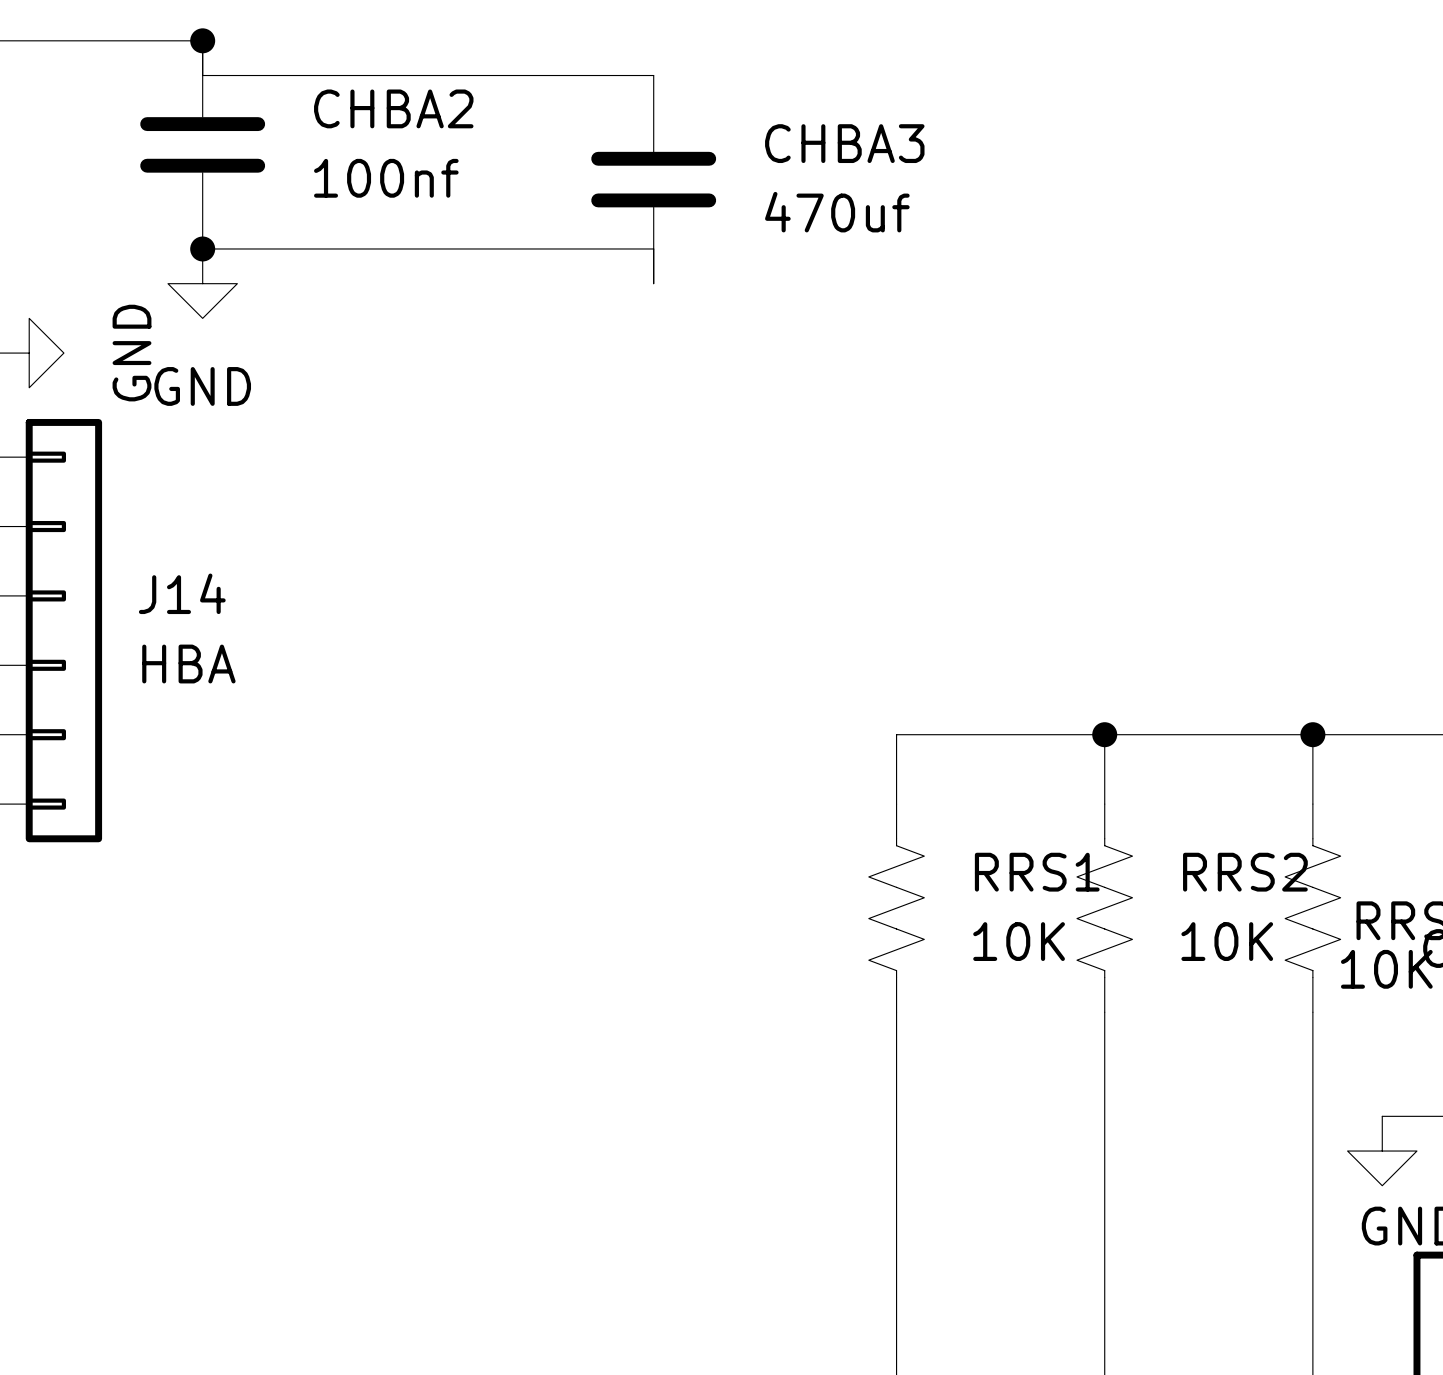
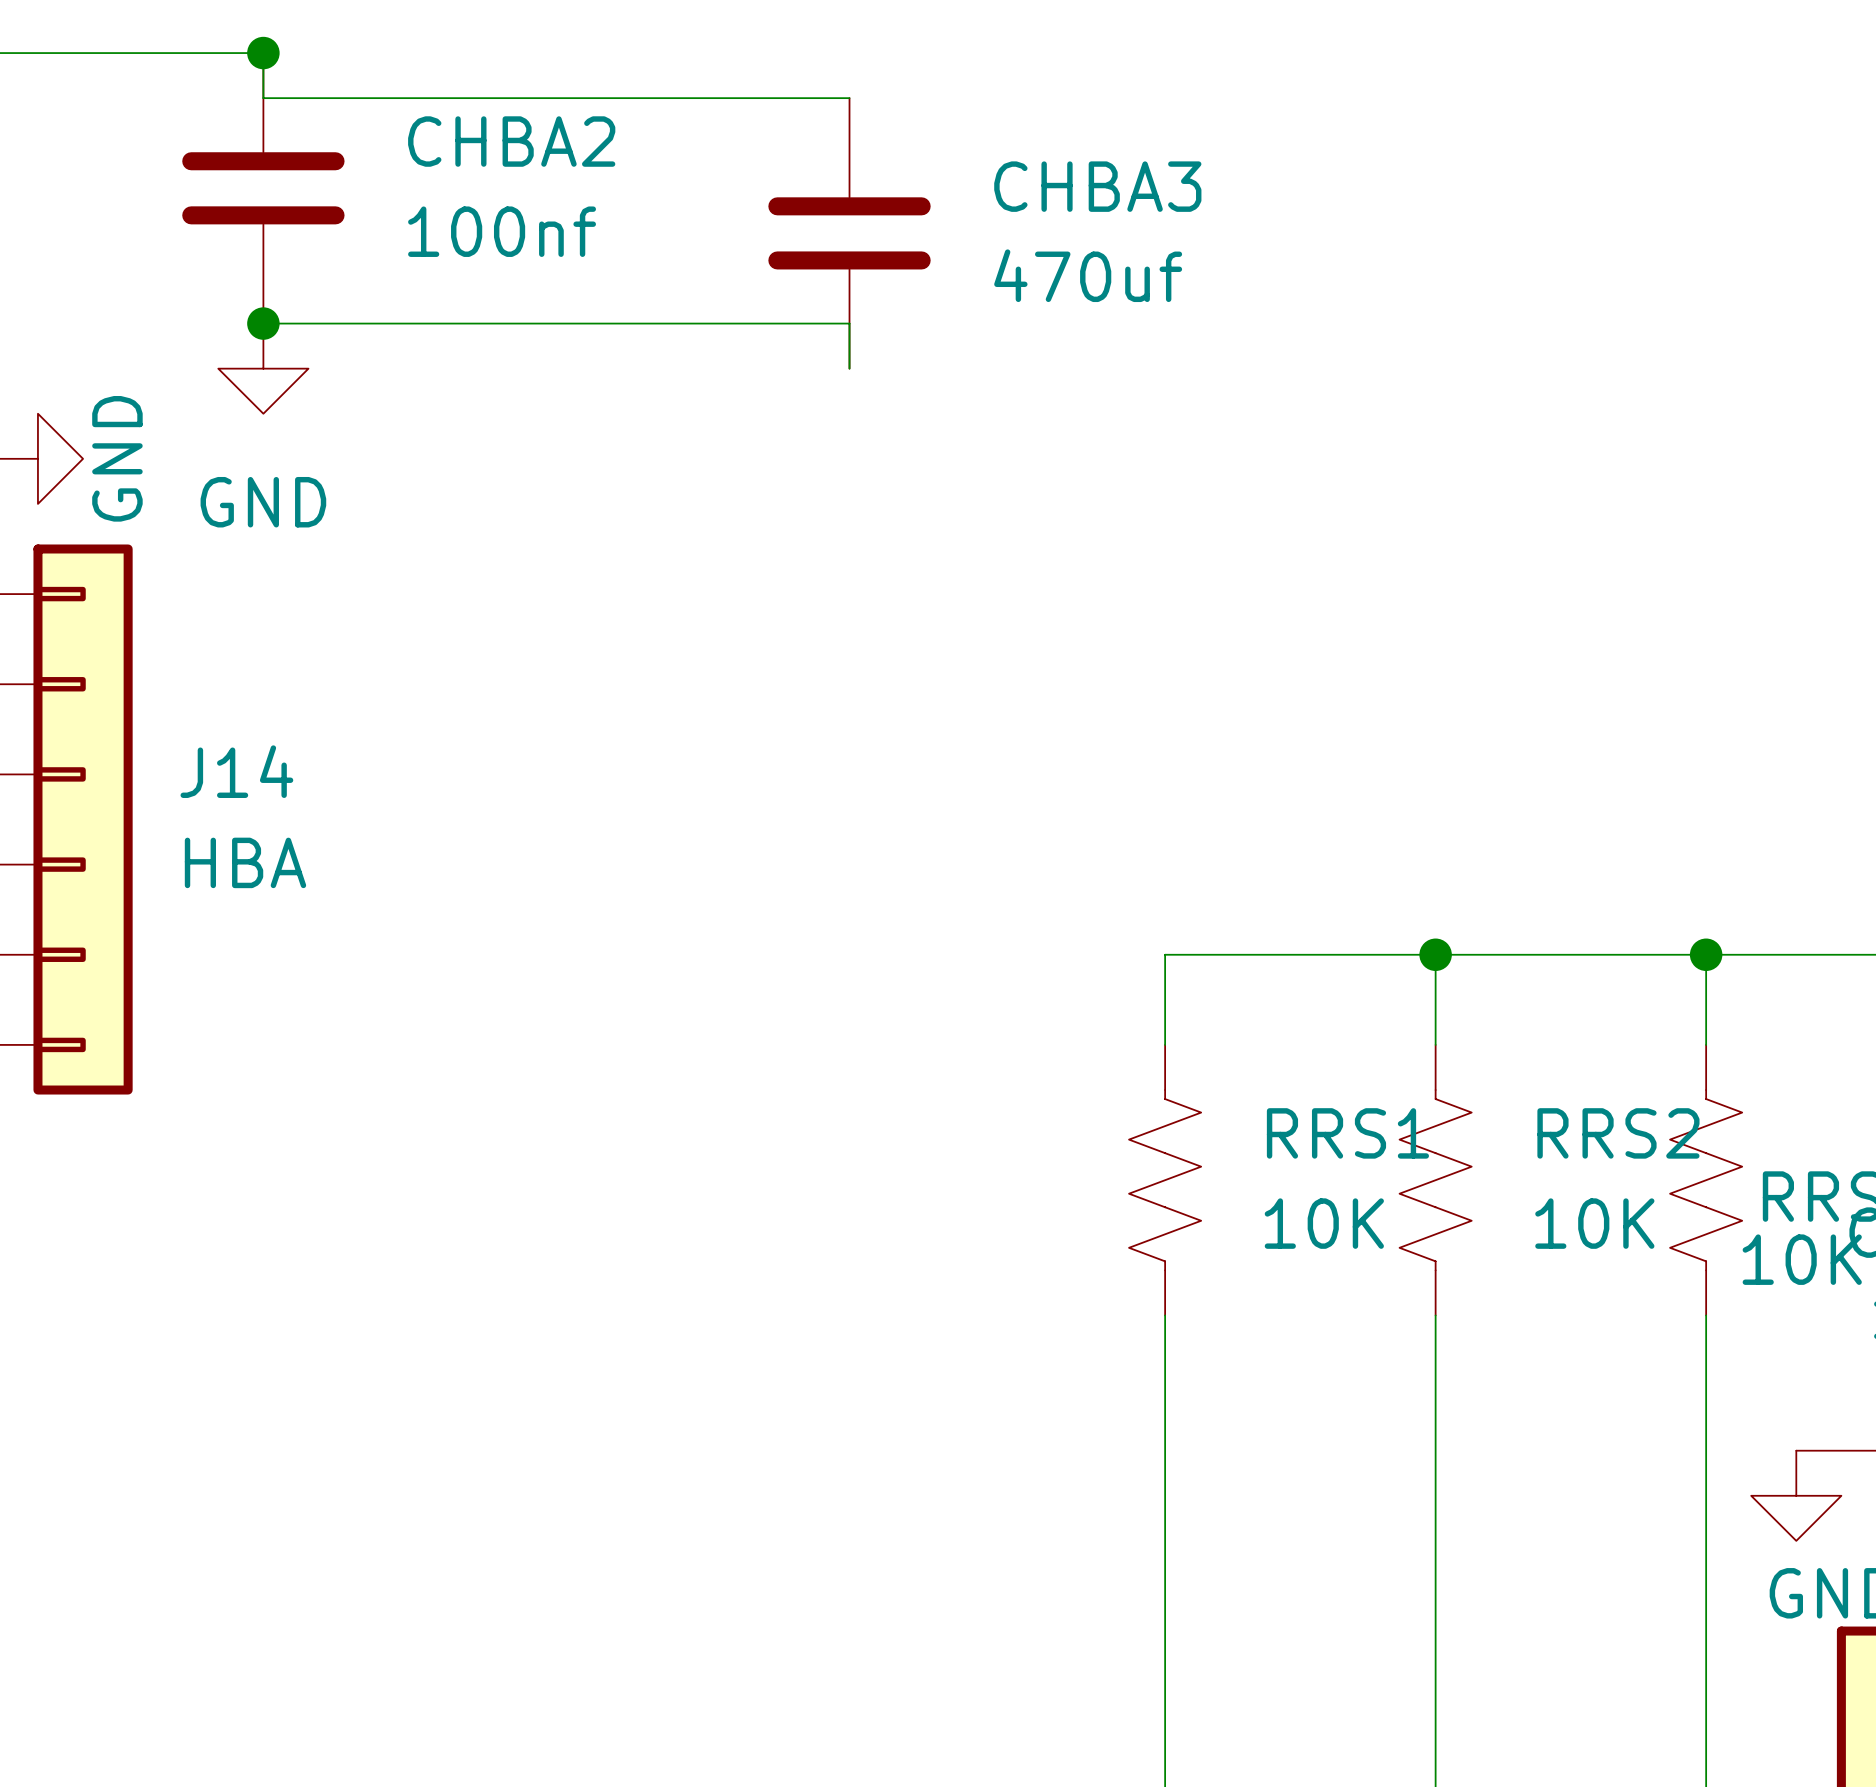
power symbol text position: GND (132, 353) -> GND (117, 458)

